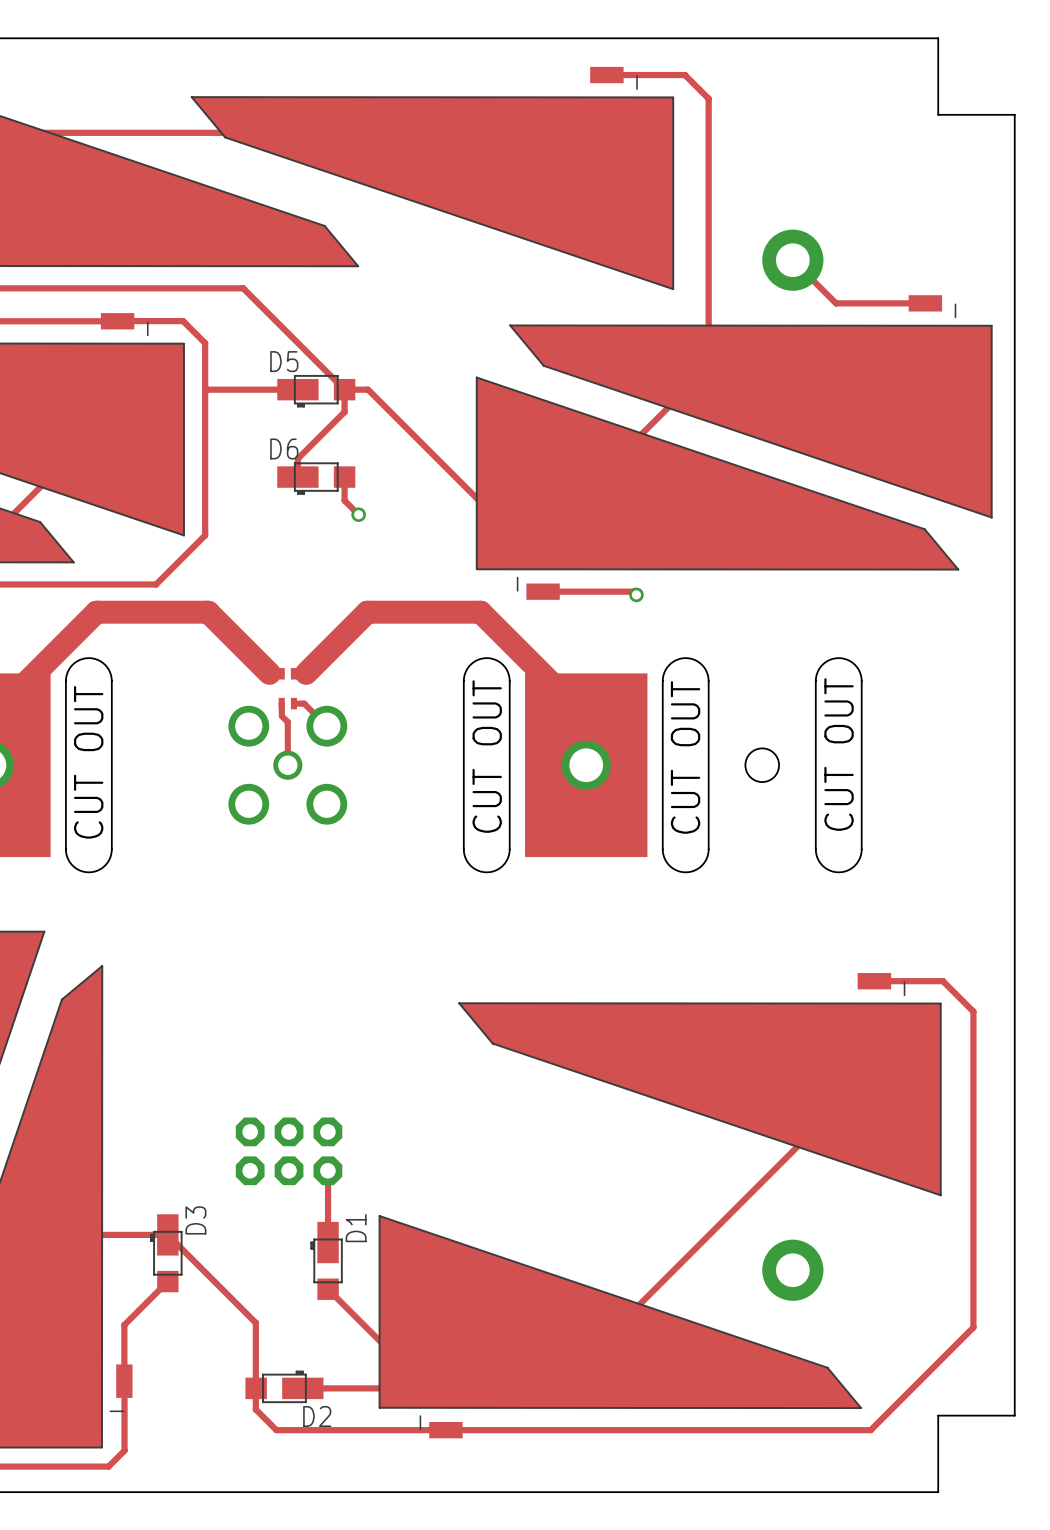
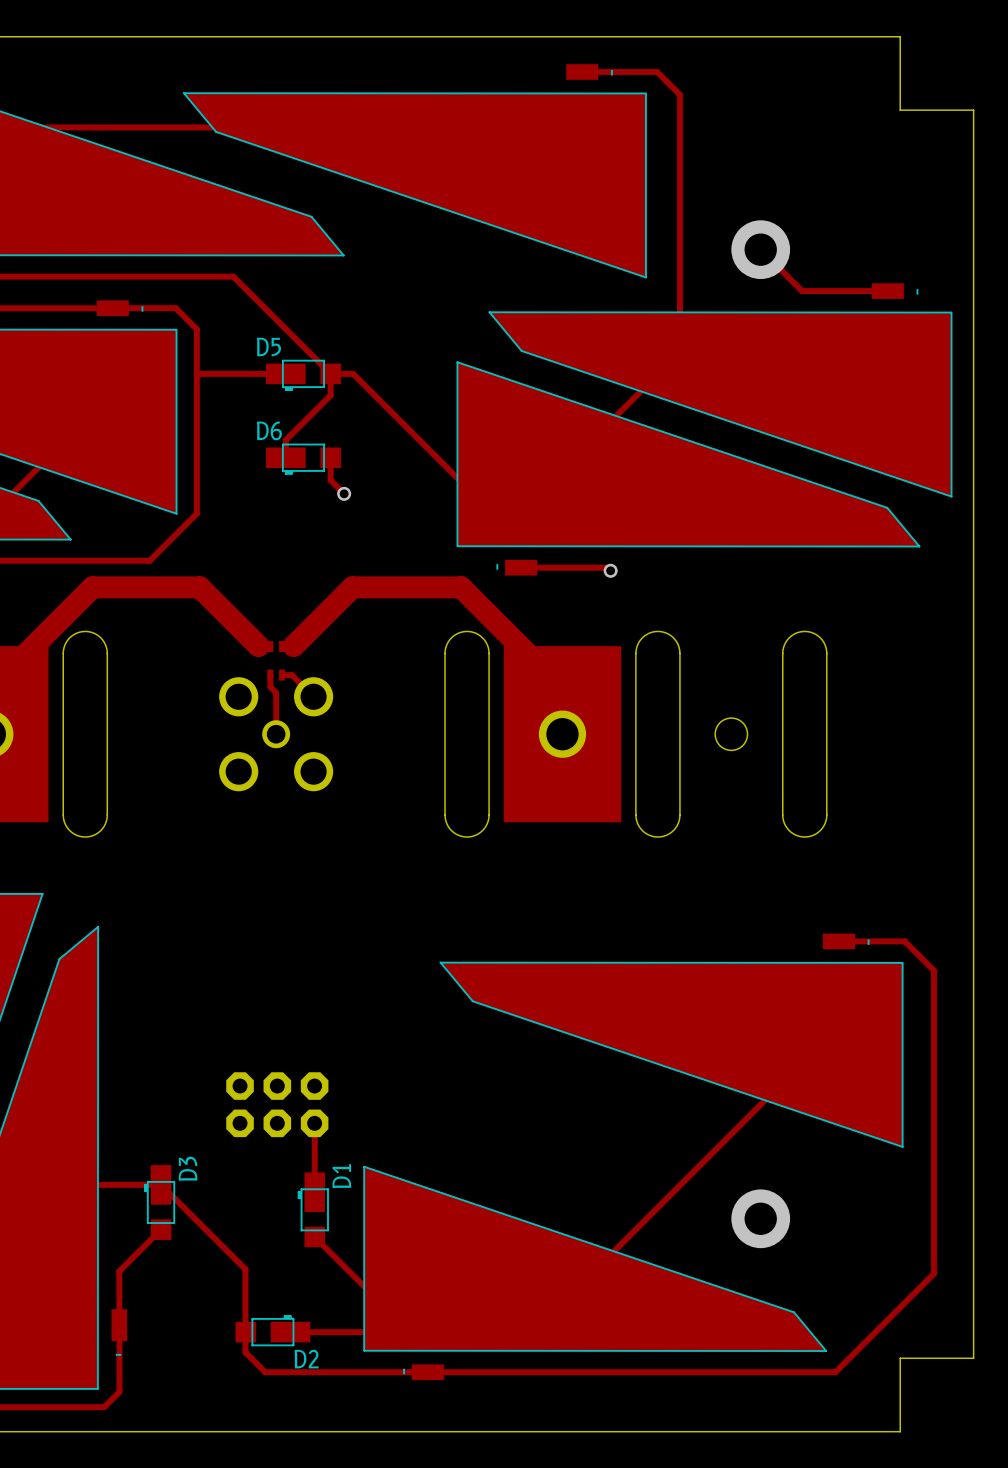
text: CUT OUT (839, 754) -> none
text: CUT OUT (487, 756) -> none
text: CUT OUT (685, 757) -> none
text: CUT OUT (88, 762) -> none

